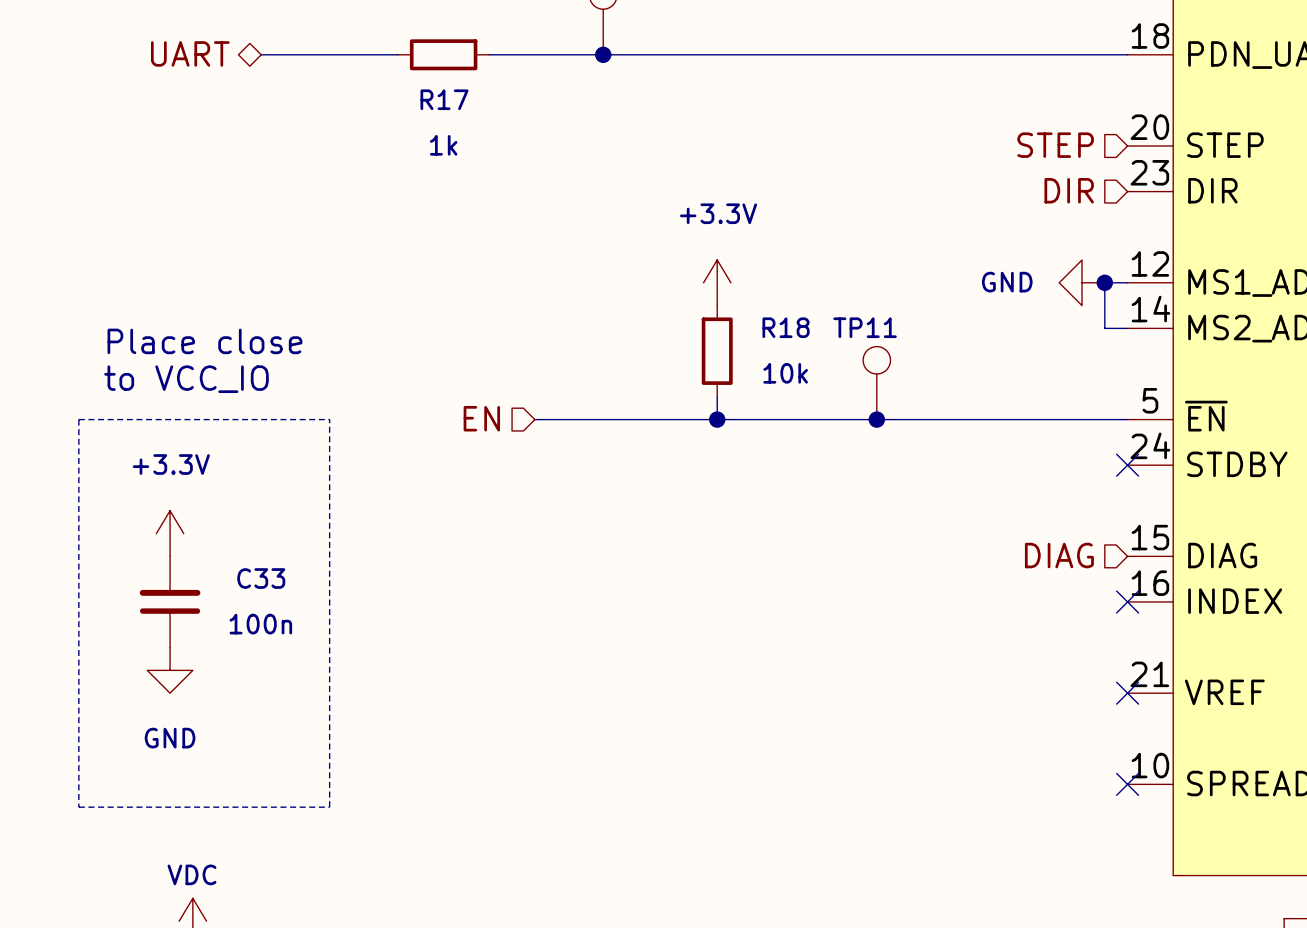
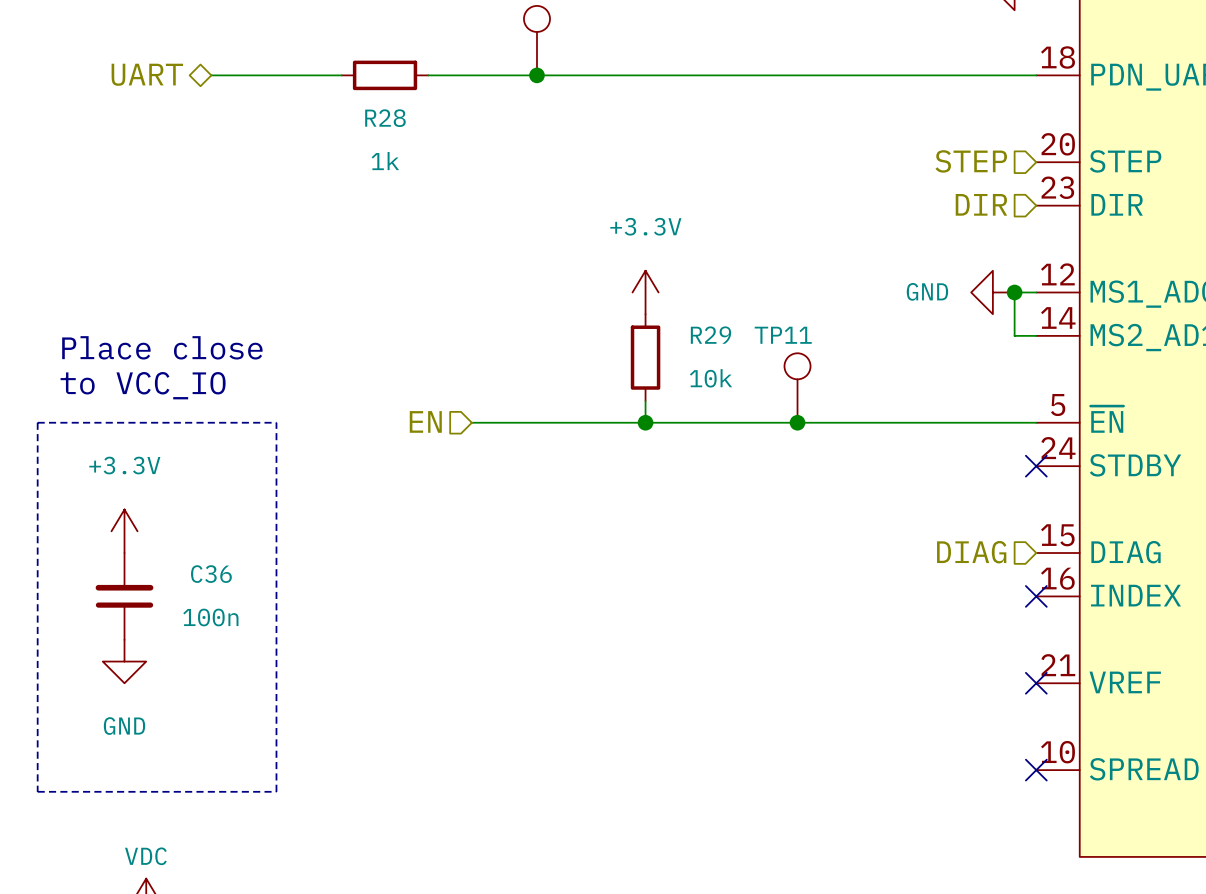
R17 name: R17 (444, 99) -> R28 (385, 118)
R18 name: R18 (786, 327) -> R29 (710, 335)
C33 name: C33 (261, 578) -> C36 (211, 574)

